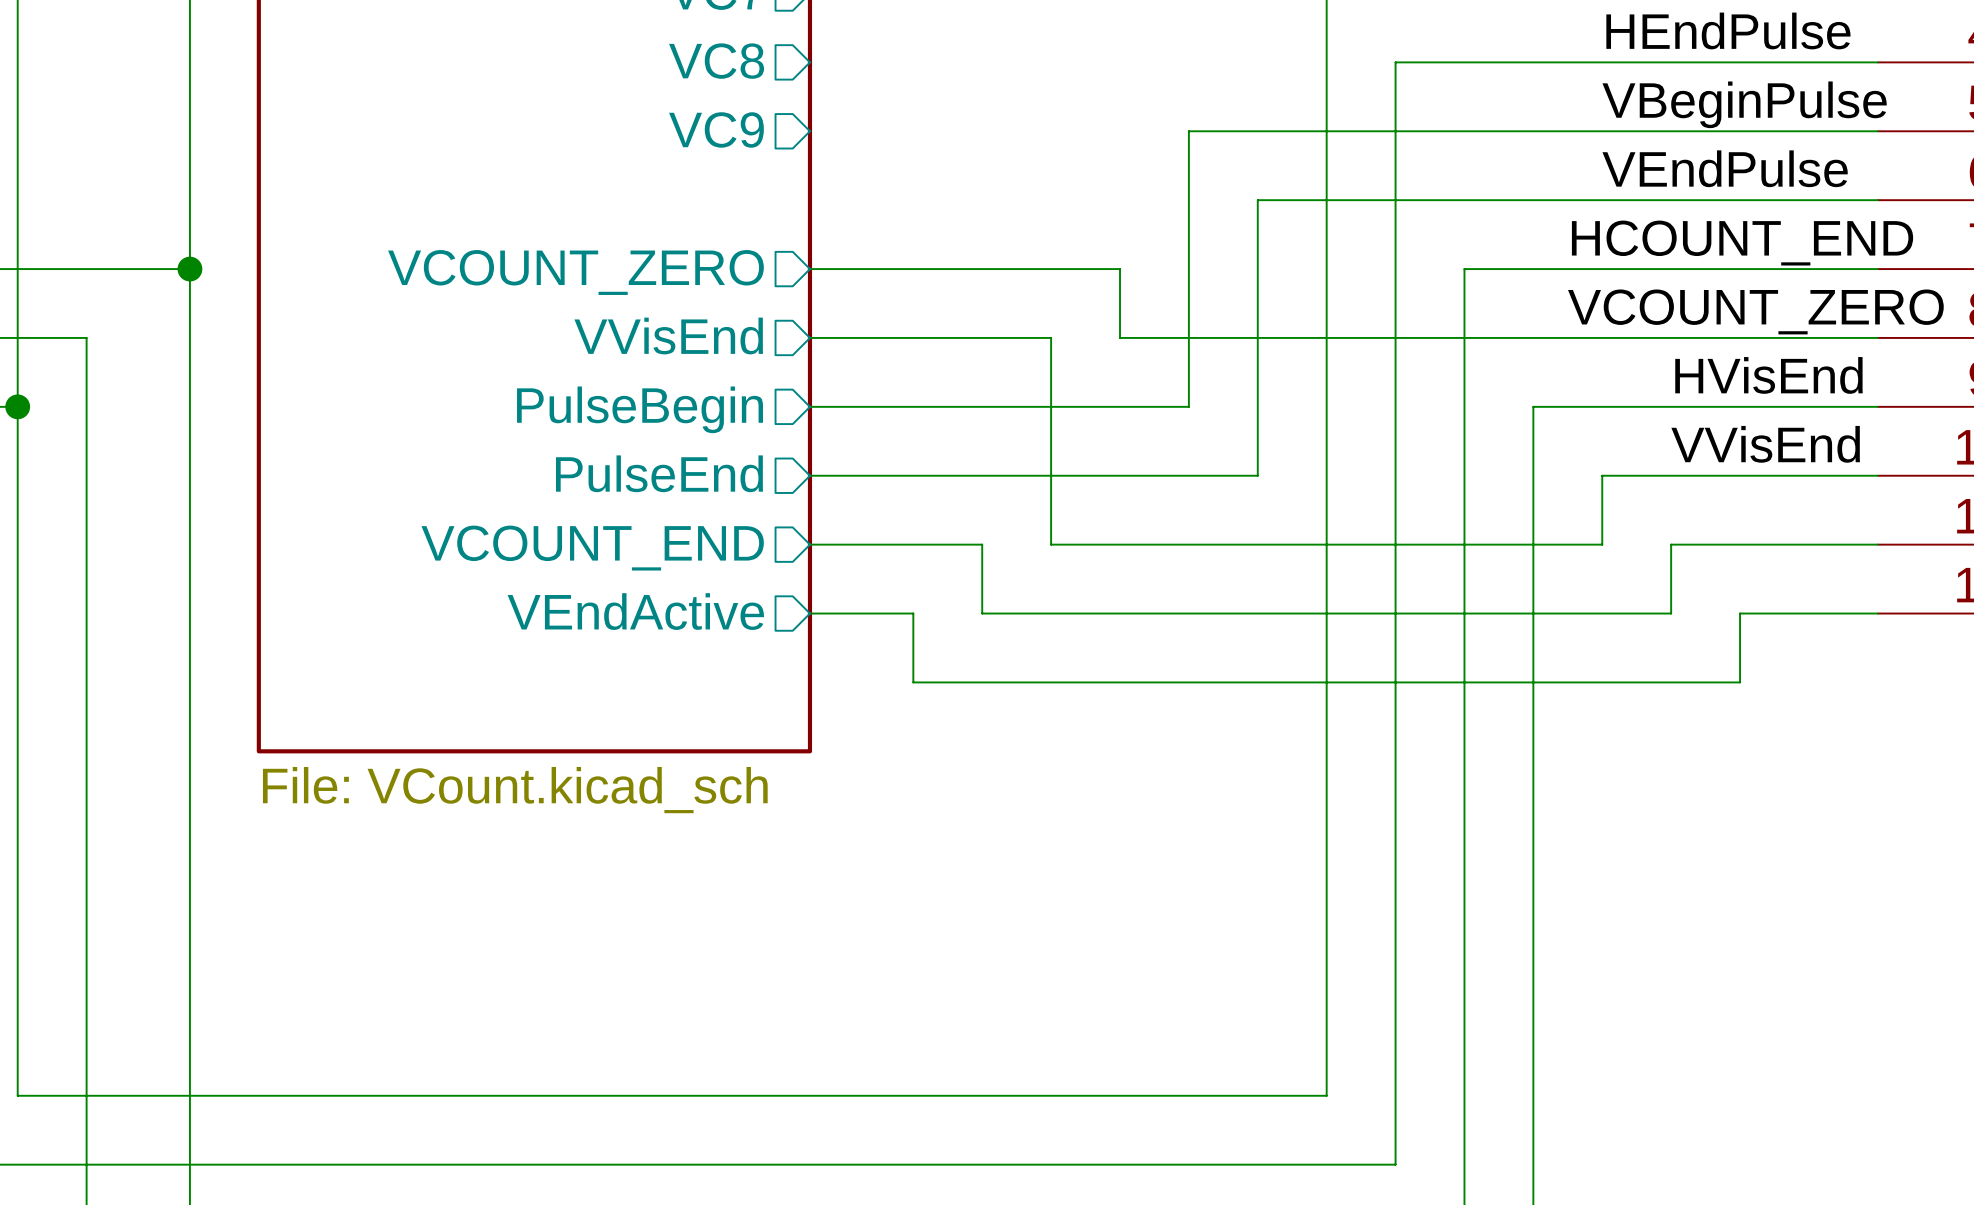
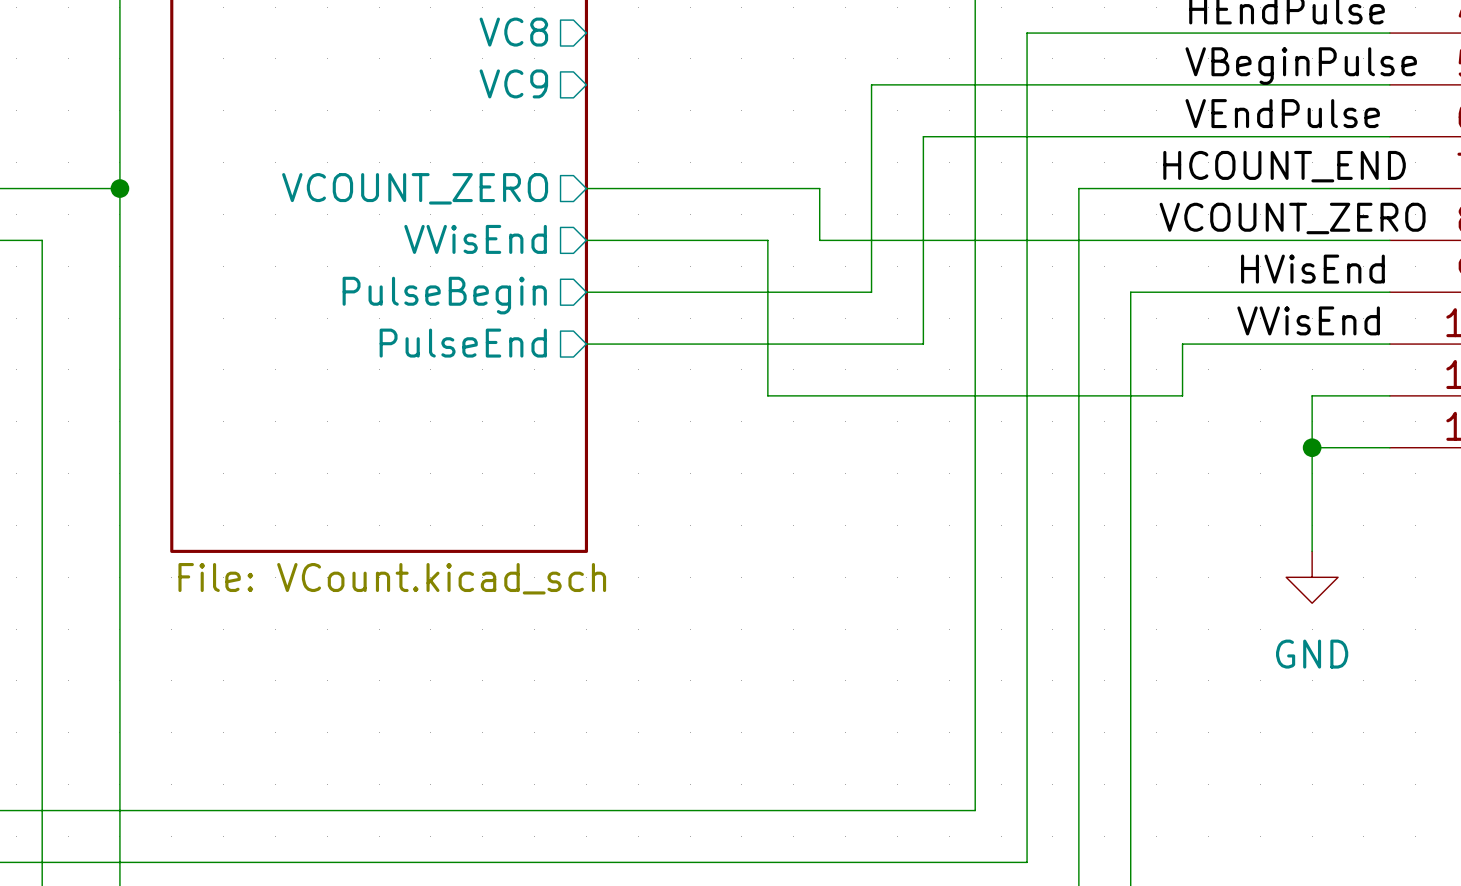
wire: (809, 544) (982, 544) (982, 613) (1671, 613) (1671, 544) (1774, 544) -> (1312, 551) (1312, 395)
sheet pin: VCOUNT_END (592, 548) -> none
sheet pin: VEndActive (635, 611) -> none
wire: (809, 613) (913, 613) (913, 682) (1740, 682) (1740, 613) (1774, 613) -> none
junction: none -> (1312, 447)
power symbol: none -> GND (1312, 577)

